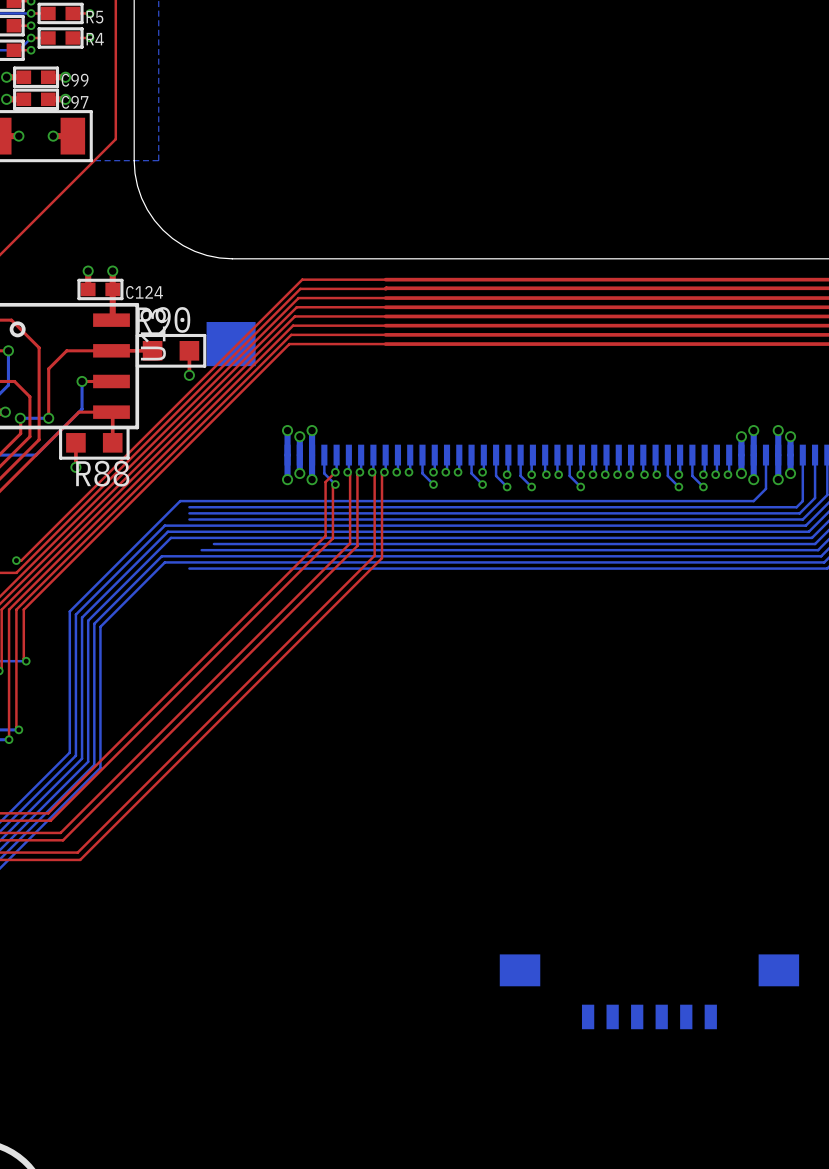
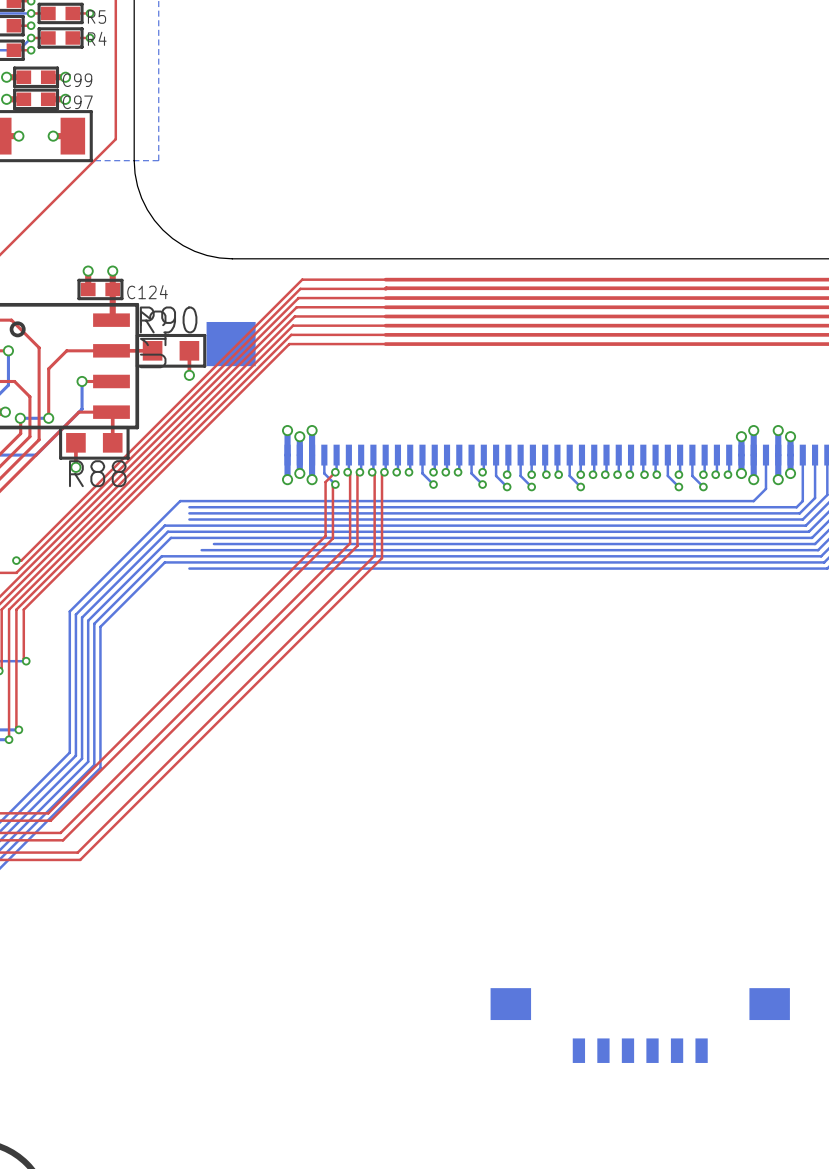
part position: (649, 991) -> (640, 1025)

